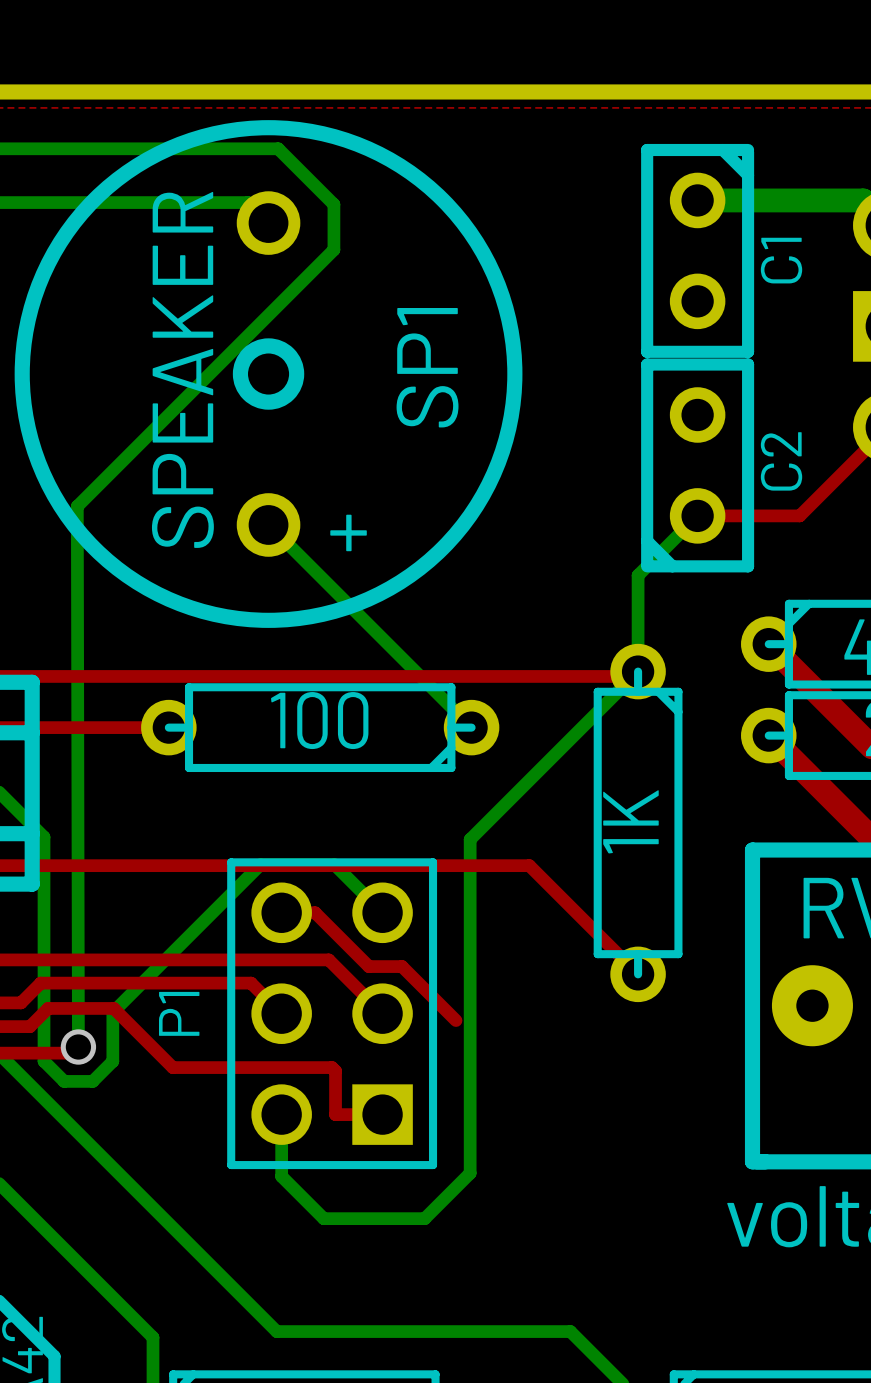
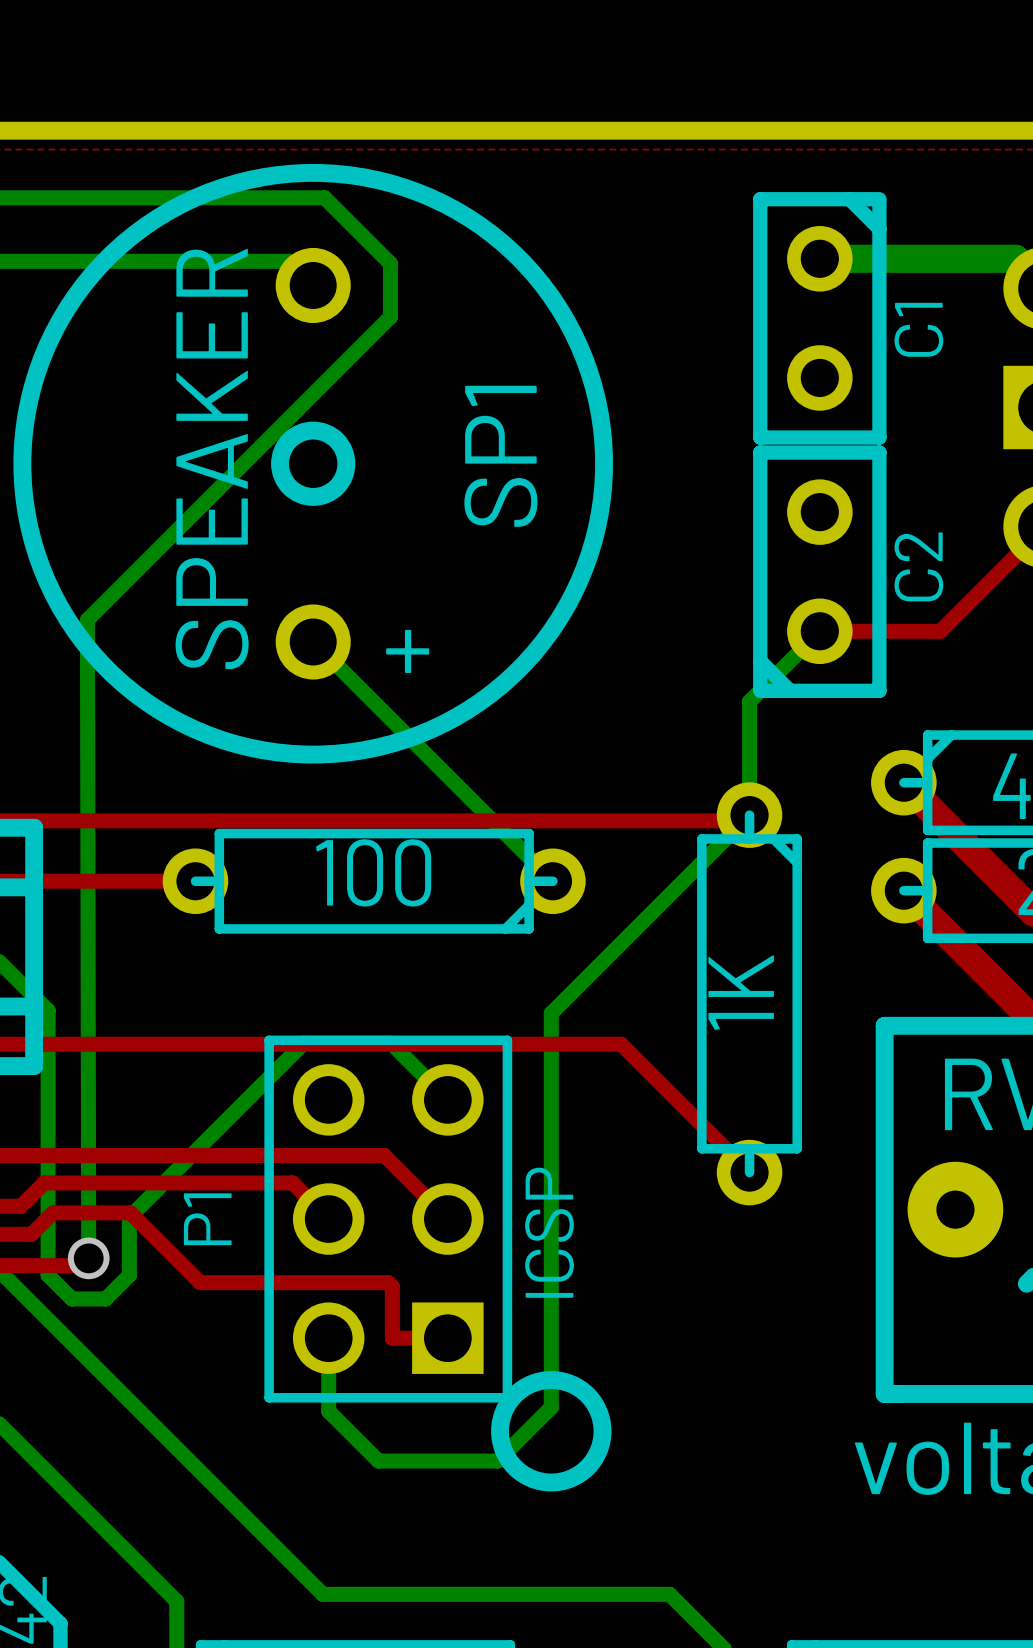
top track: (281, 912) (315, 912) (368, 966) (402, 966) (456, 1020) -> none
P1 value: none -> ICSP (549, 1232)
drawing: none -> [491, 1371, 612, 1492]

